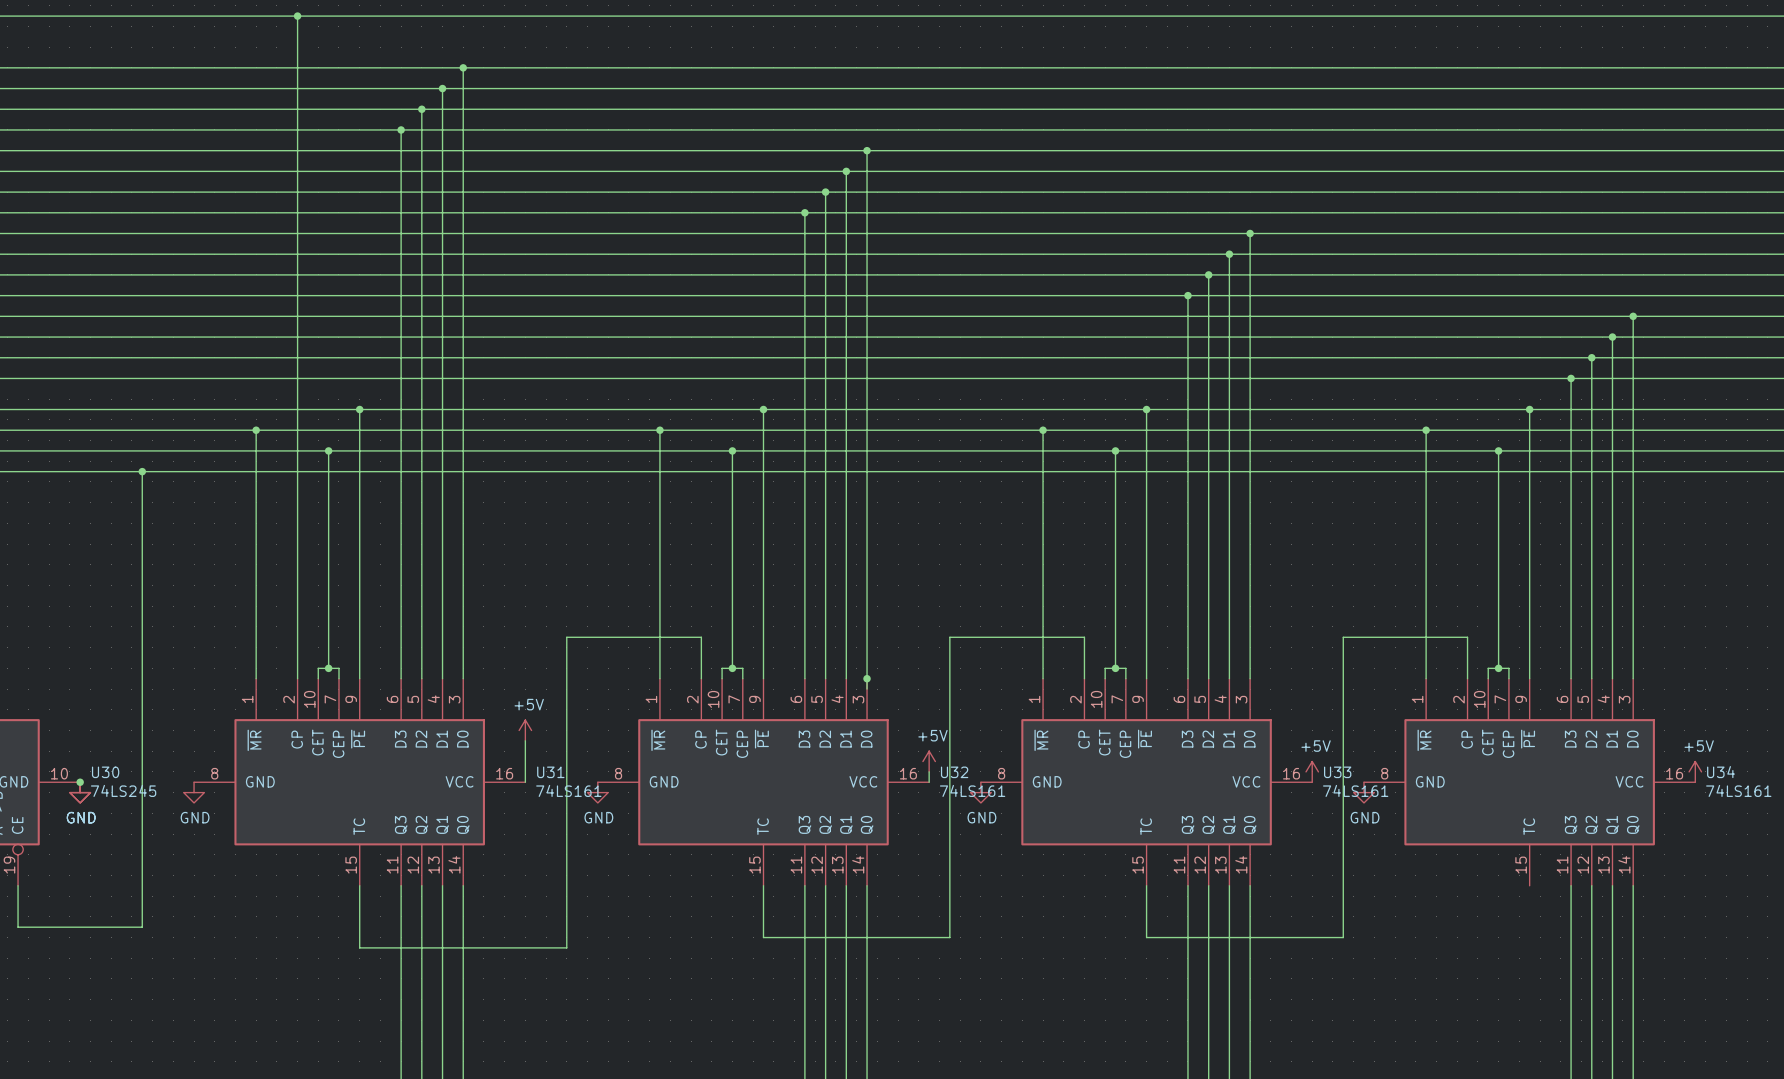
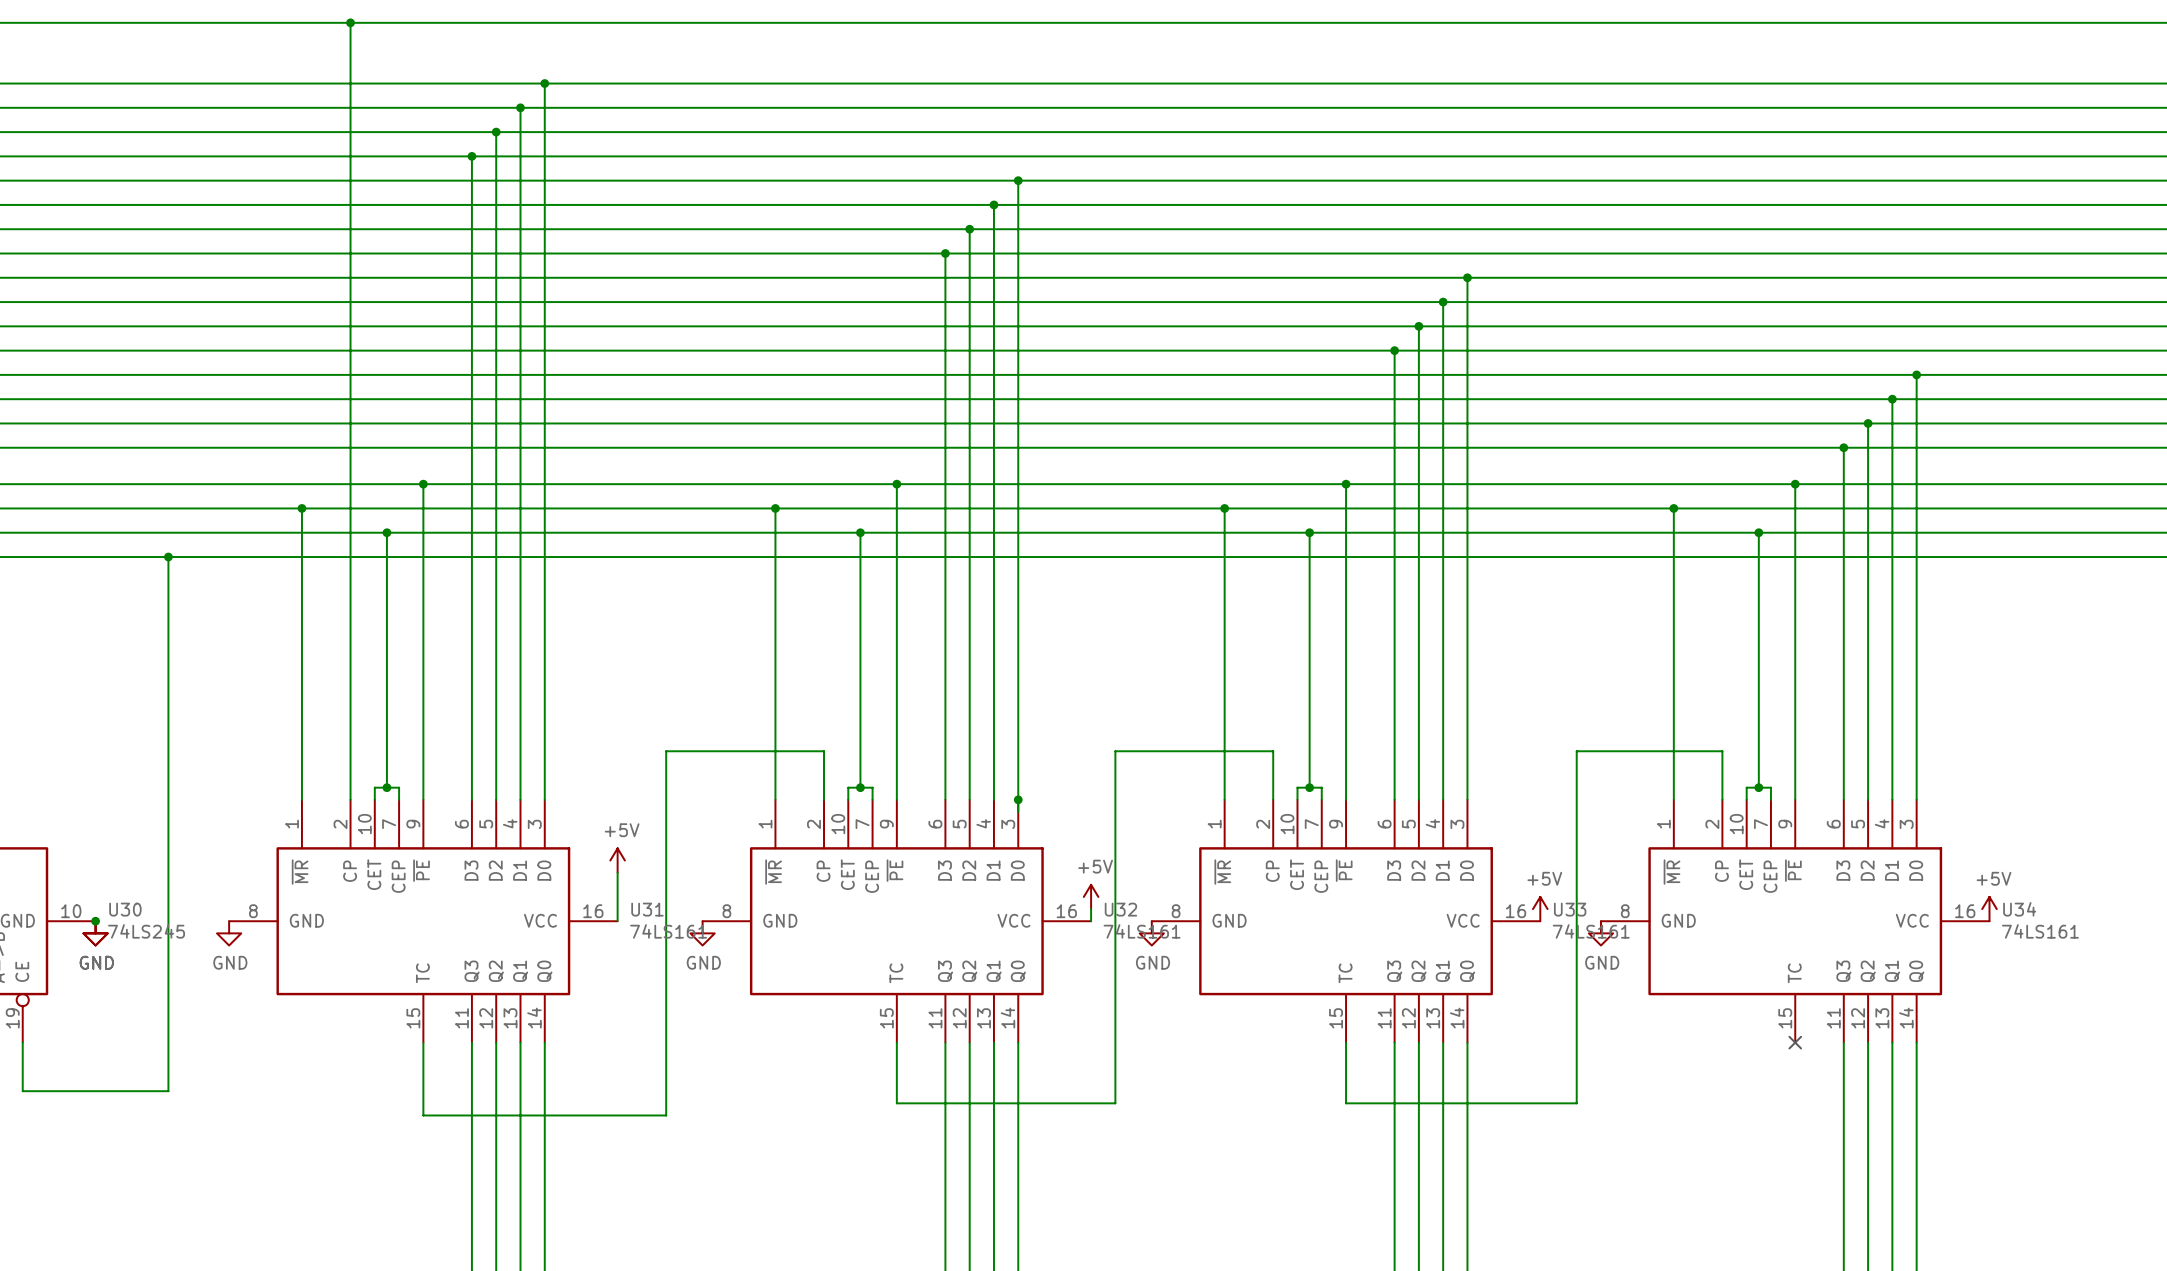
no-connect mark: none -> (1795, 1042)

